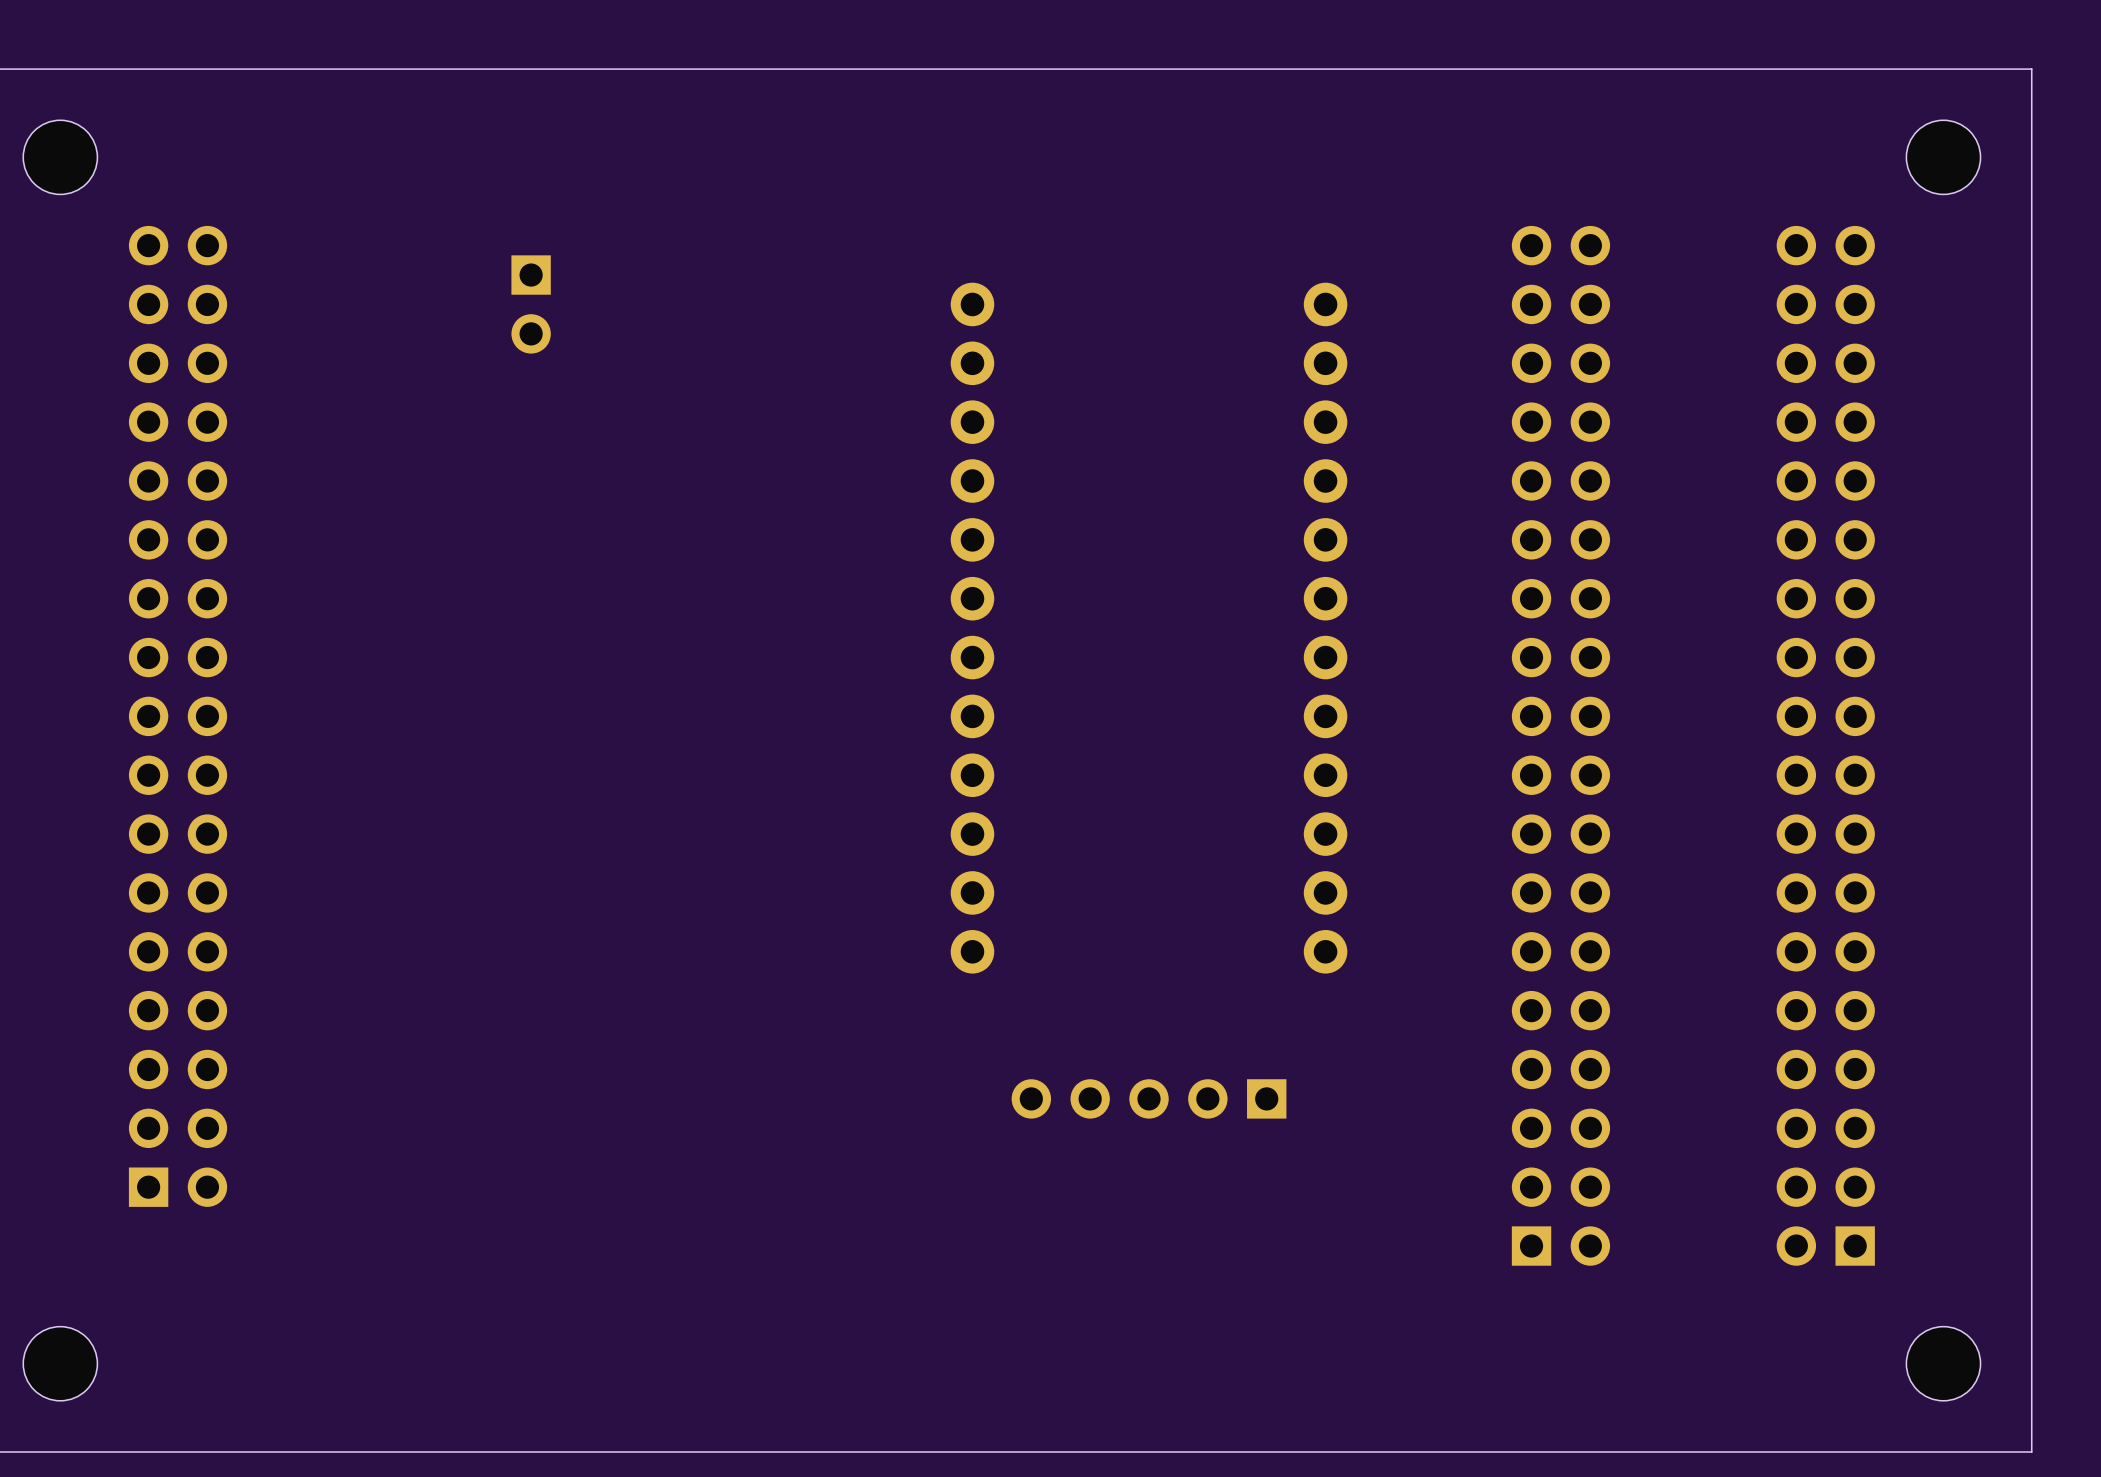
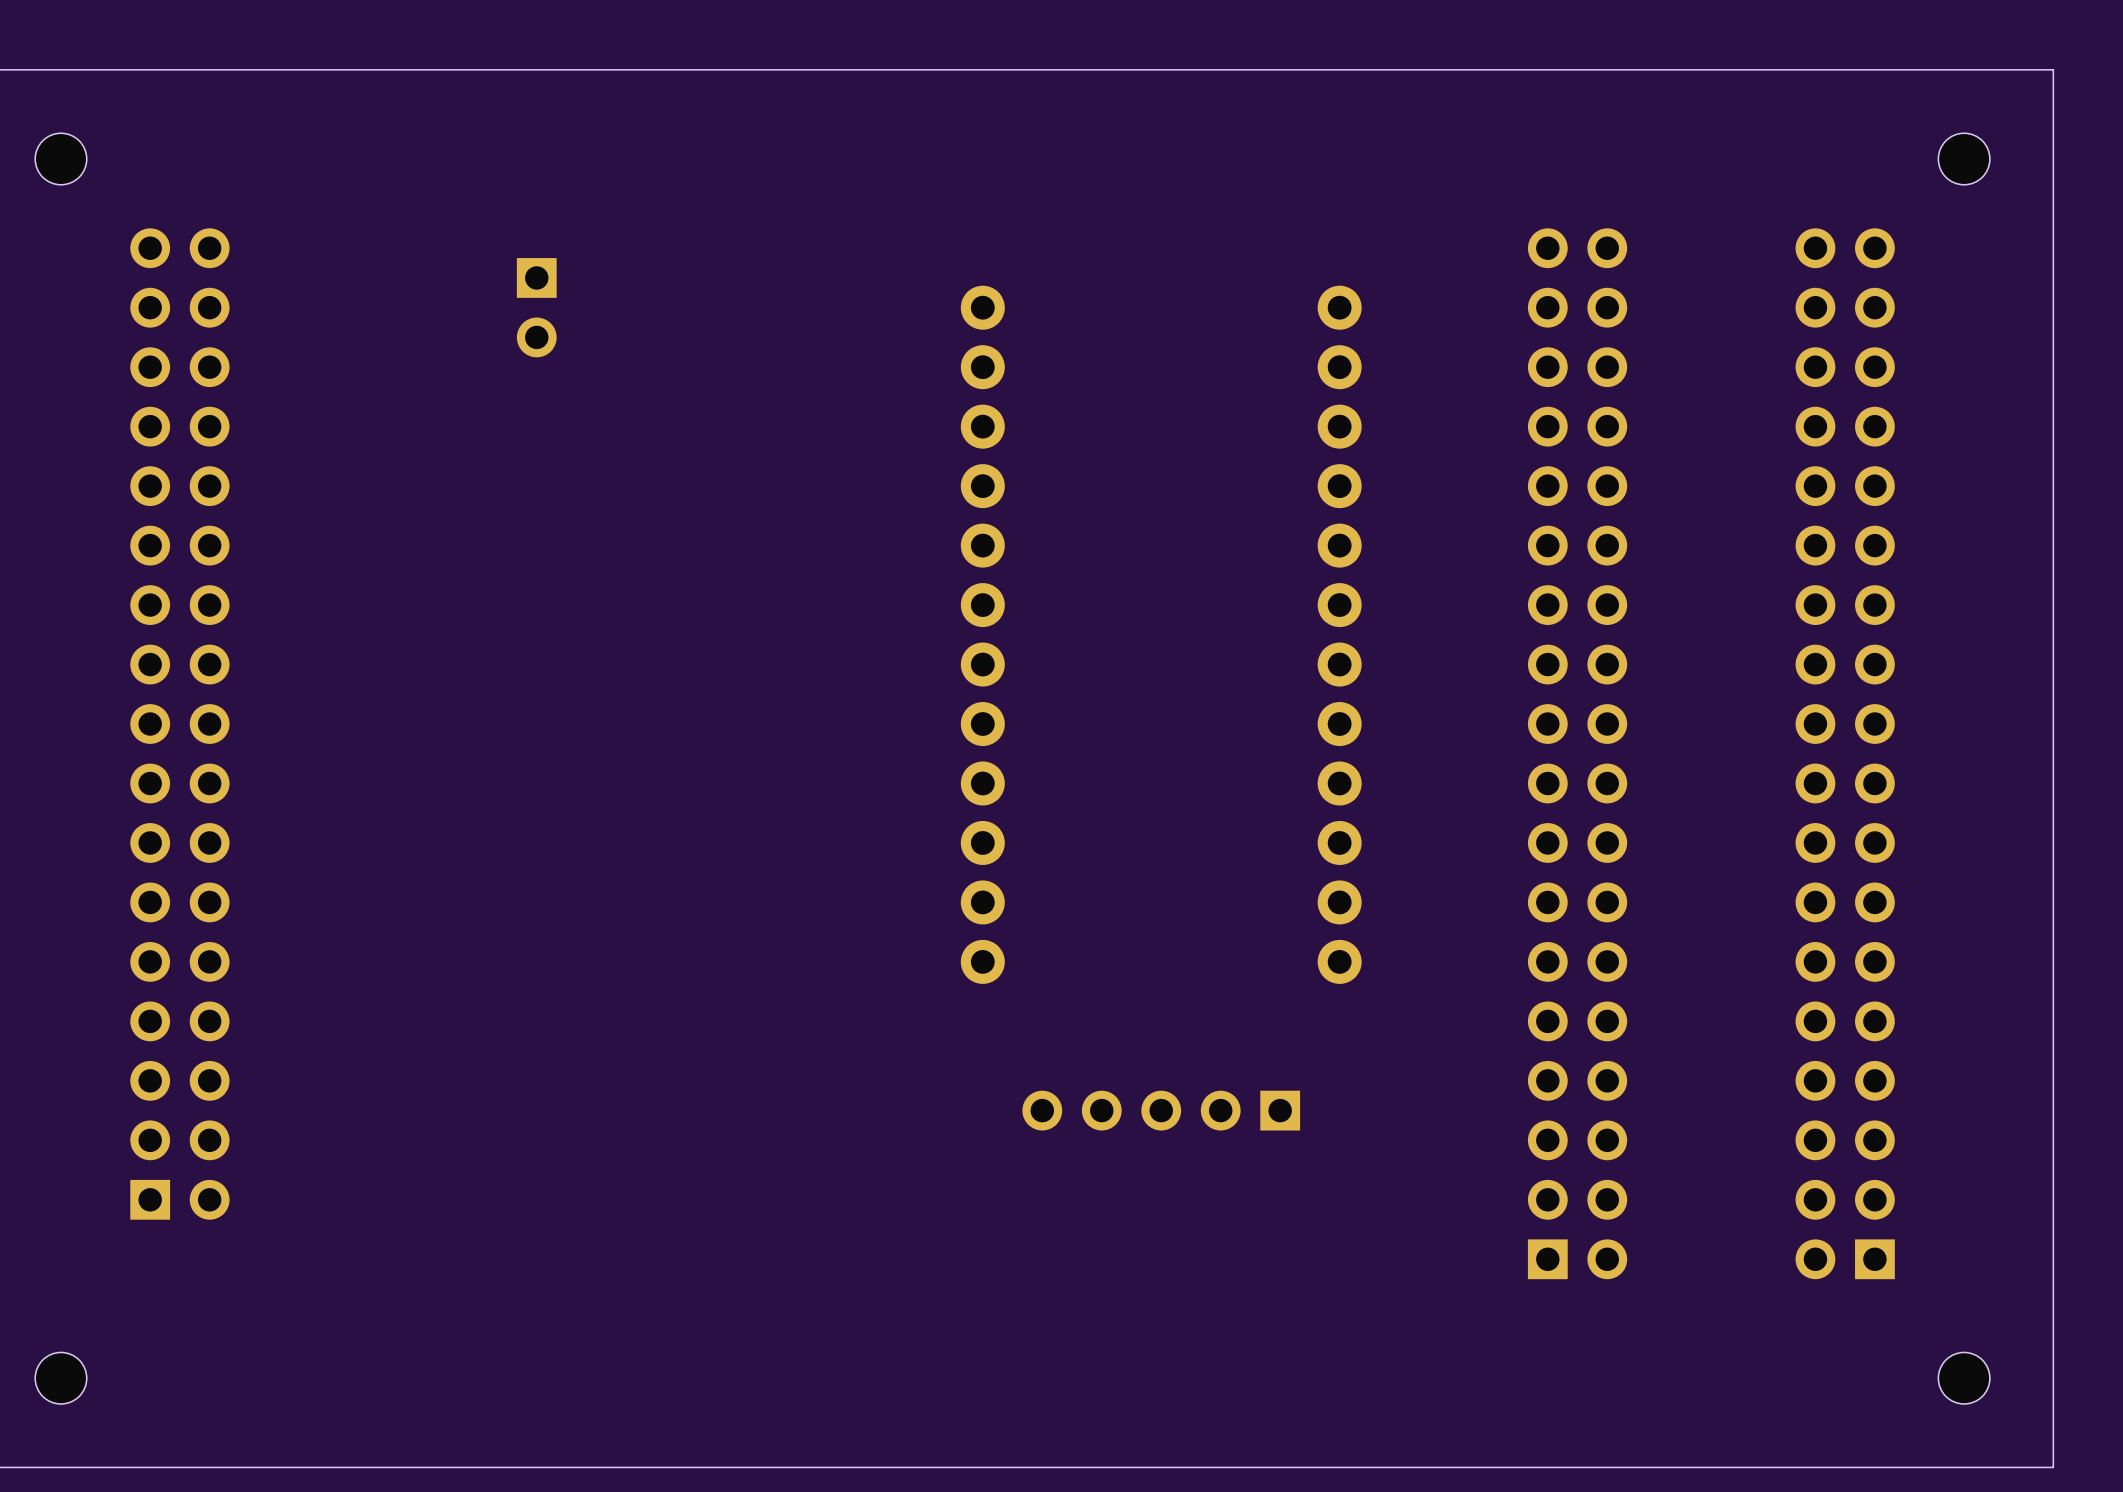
part footprint: [23, 120, 98, 195] -> [35, 133, 87, 185]
part footprint: [1906, 120, 1981, 195] -> [1938, 133, 1990, 185]
part footprint: [23, 1326, 98, 1401] -> [35, 1352, 87, 1404]
part footprint: [1906, 1326, 1981, 1401] -> [1938, 1352, 1990, 1404]

